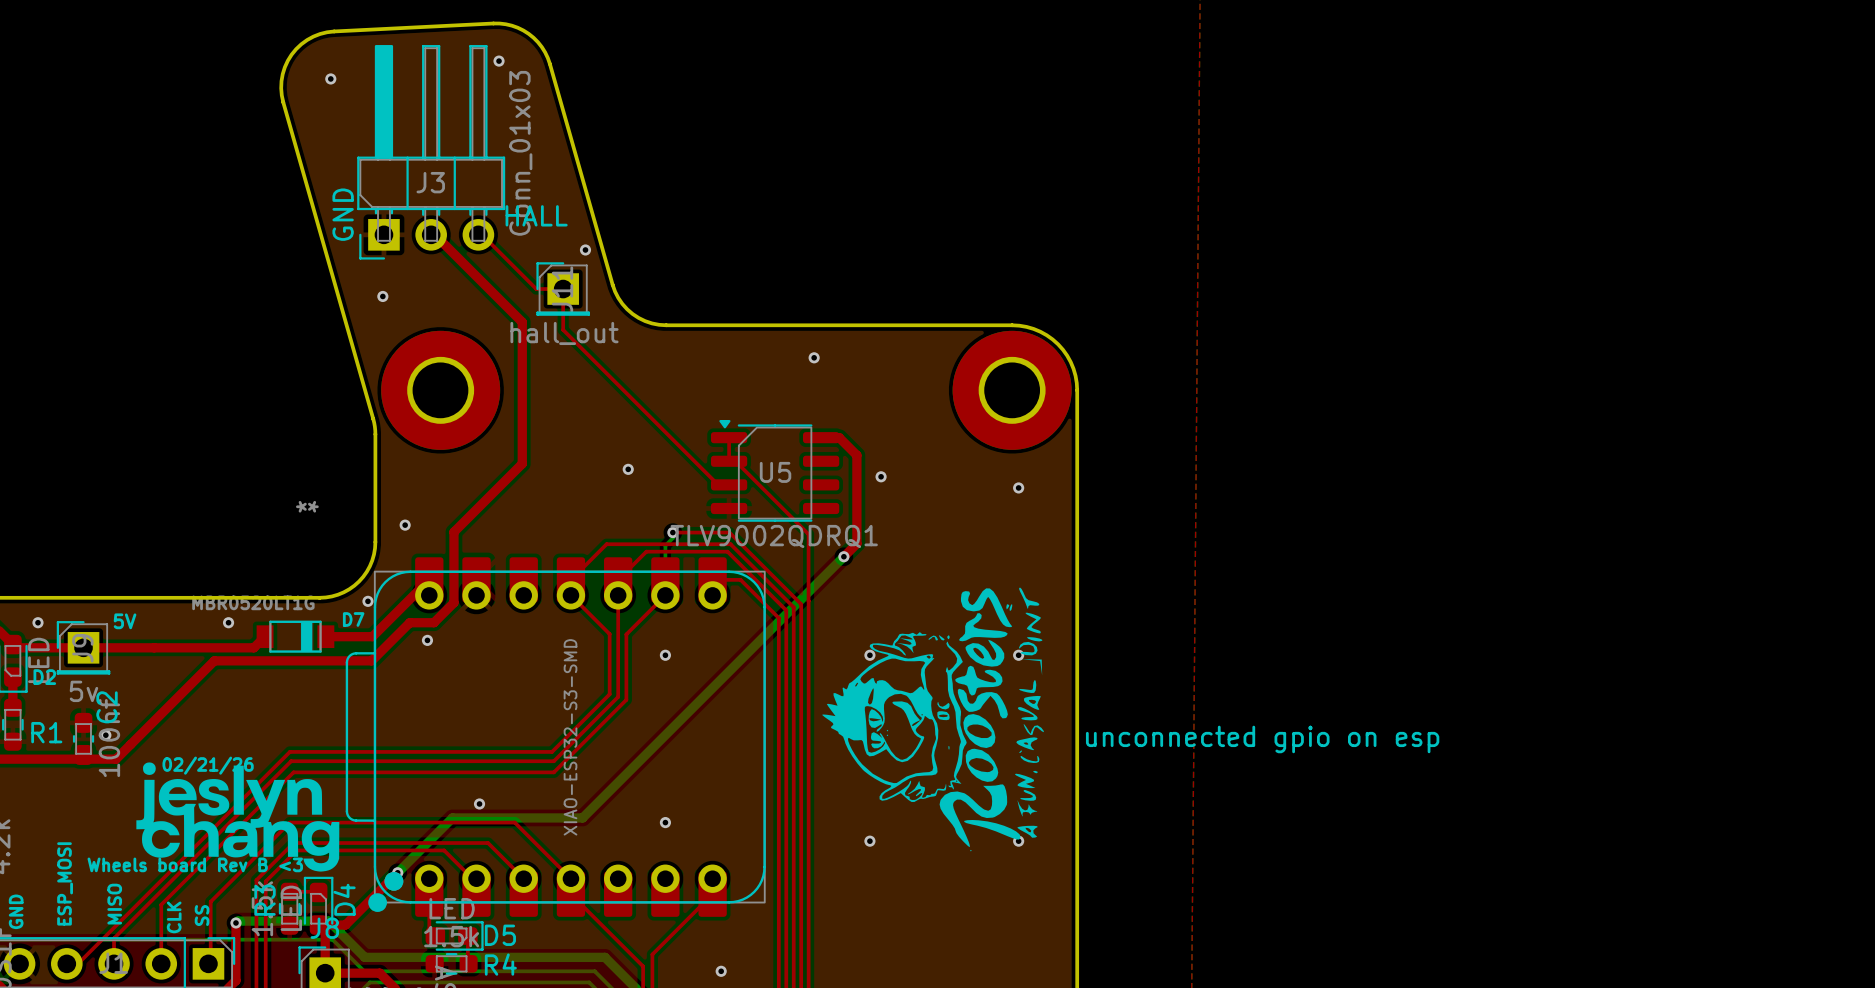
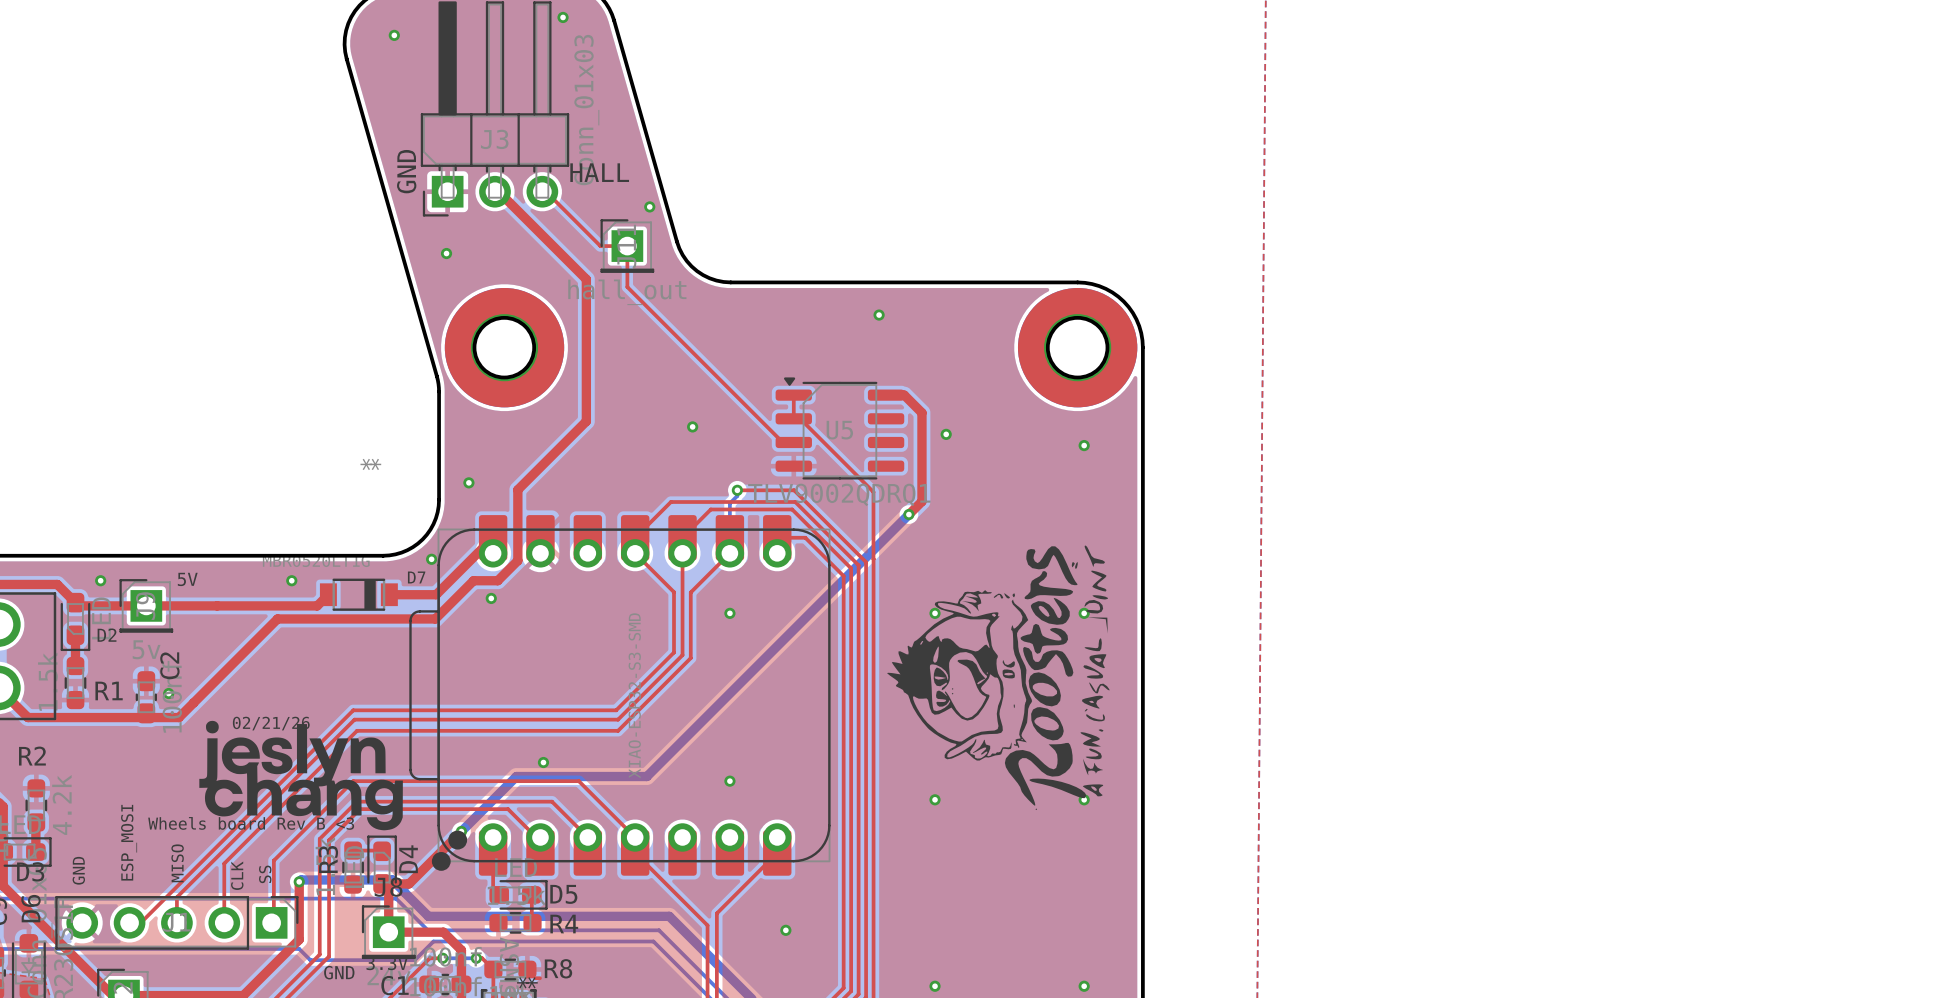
text: unconnected gpio on esp (1262, 739) -> none

